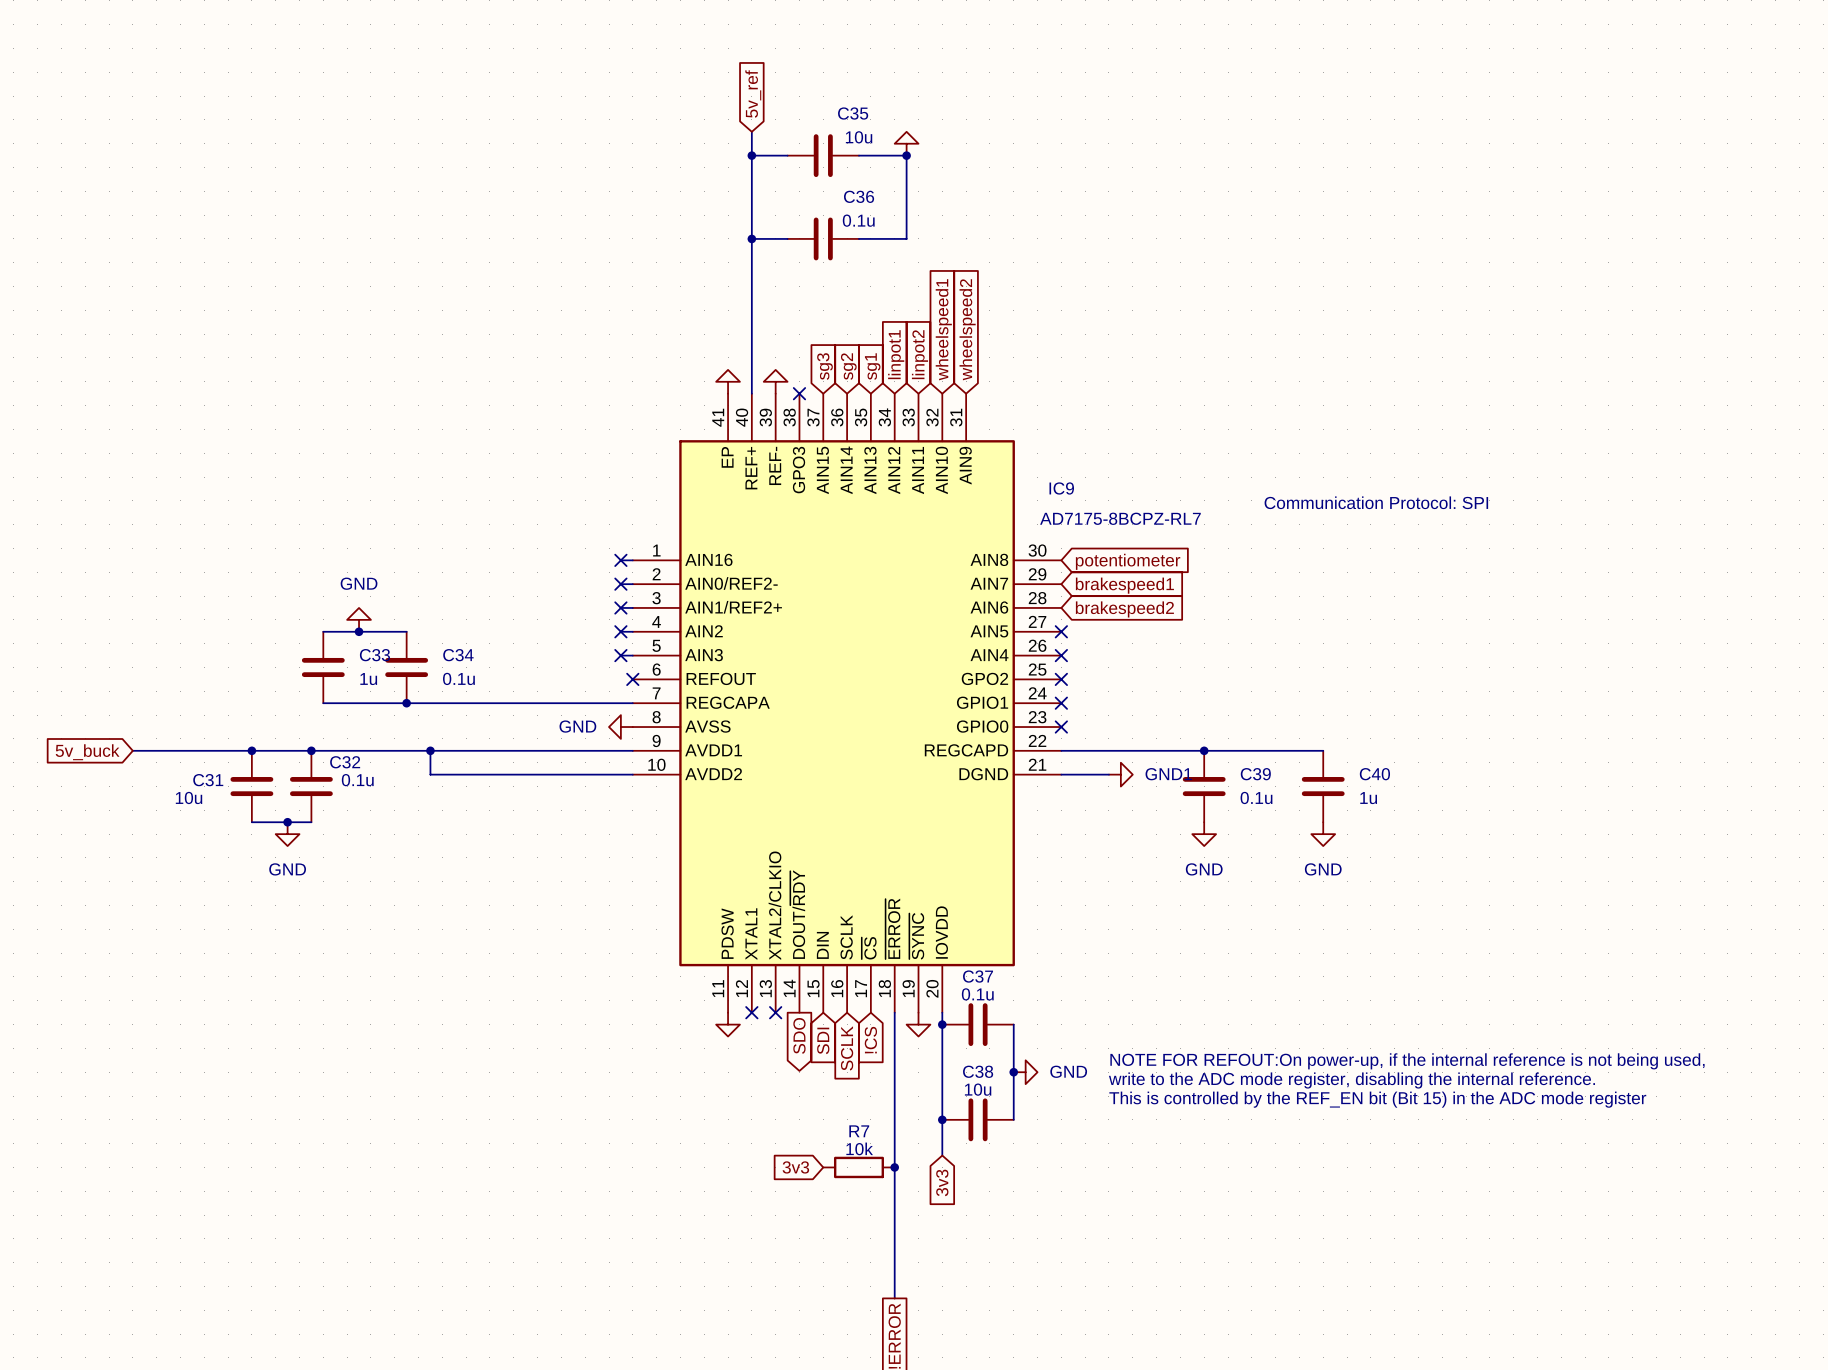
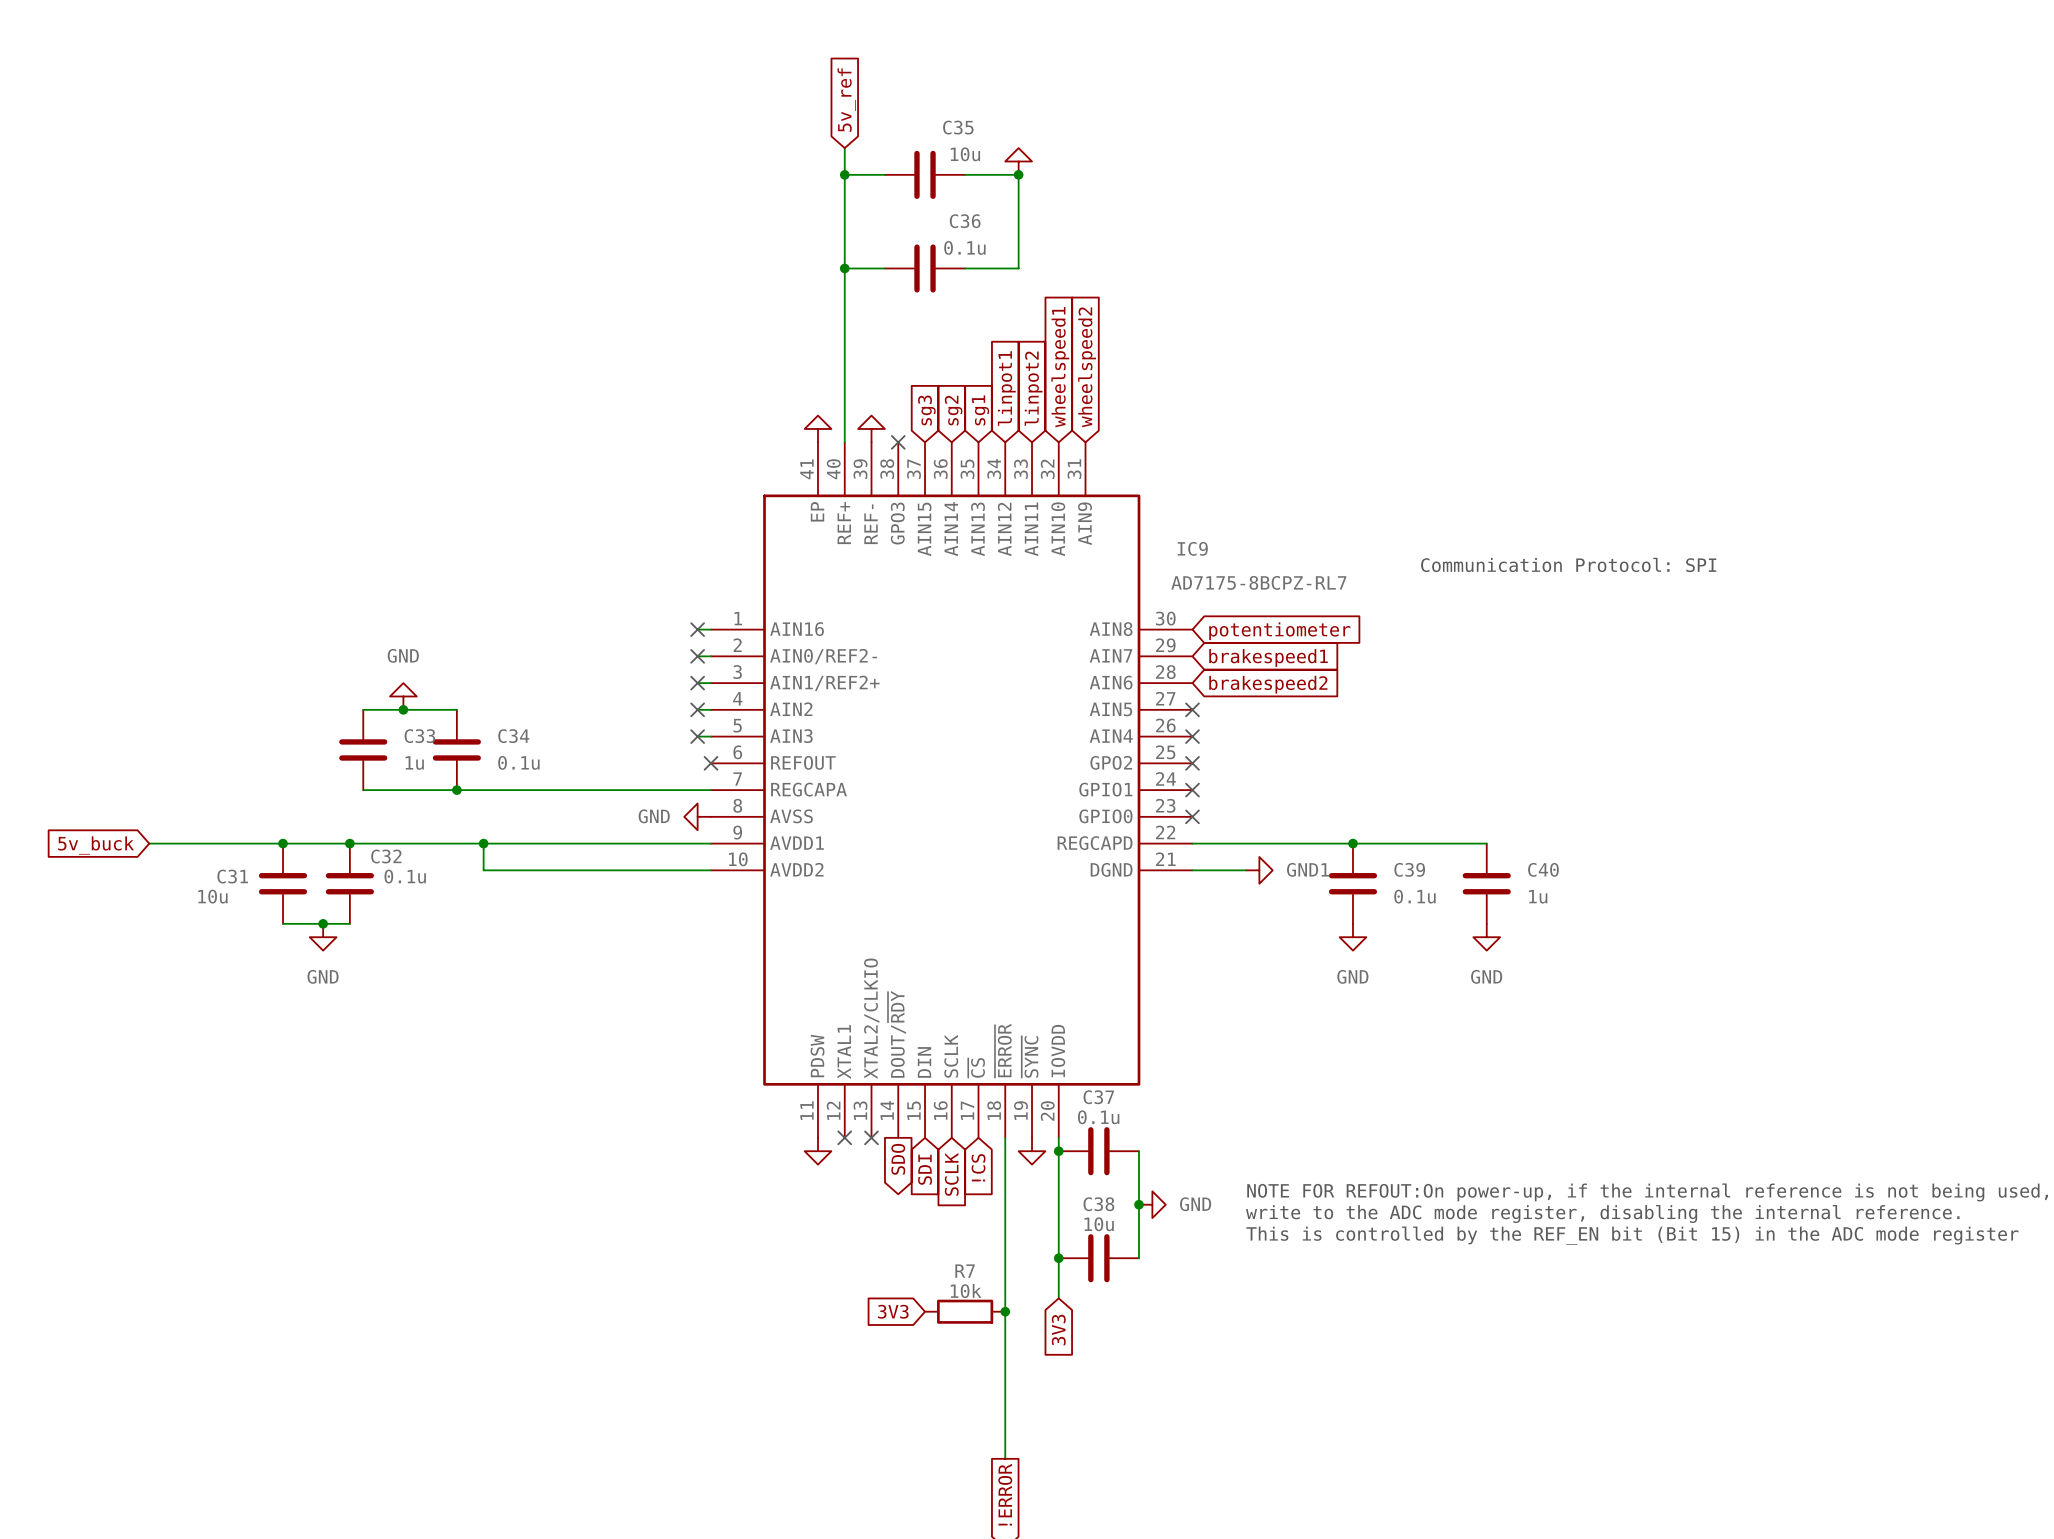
global label: 3v3 (795, 1167) -> 3V3 (893, 1311)
global label: 3v3 (942, 1182) -> 3V3 (1058, 1330)

